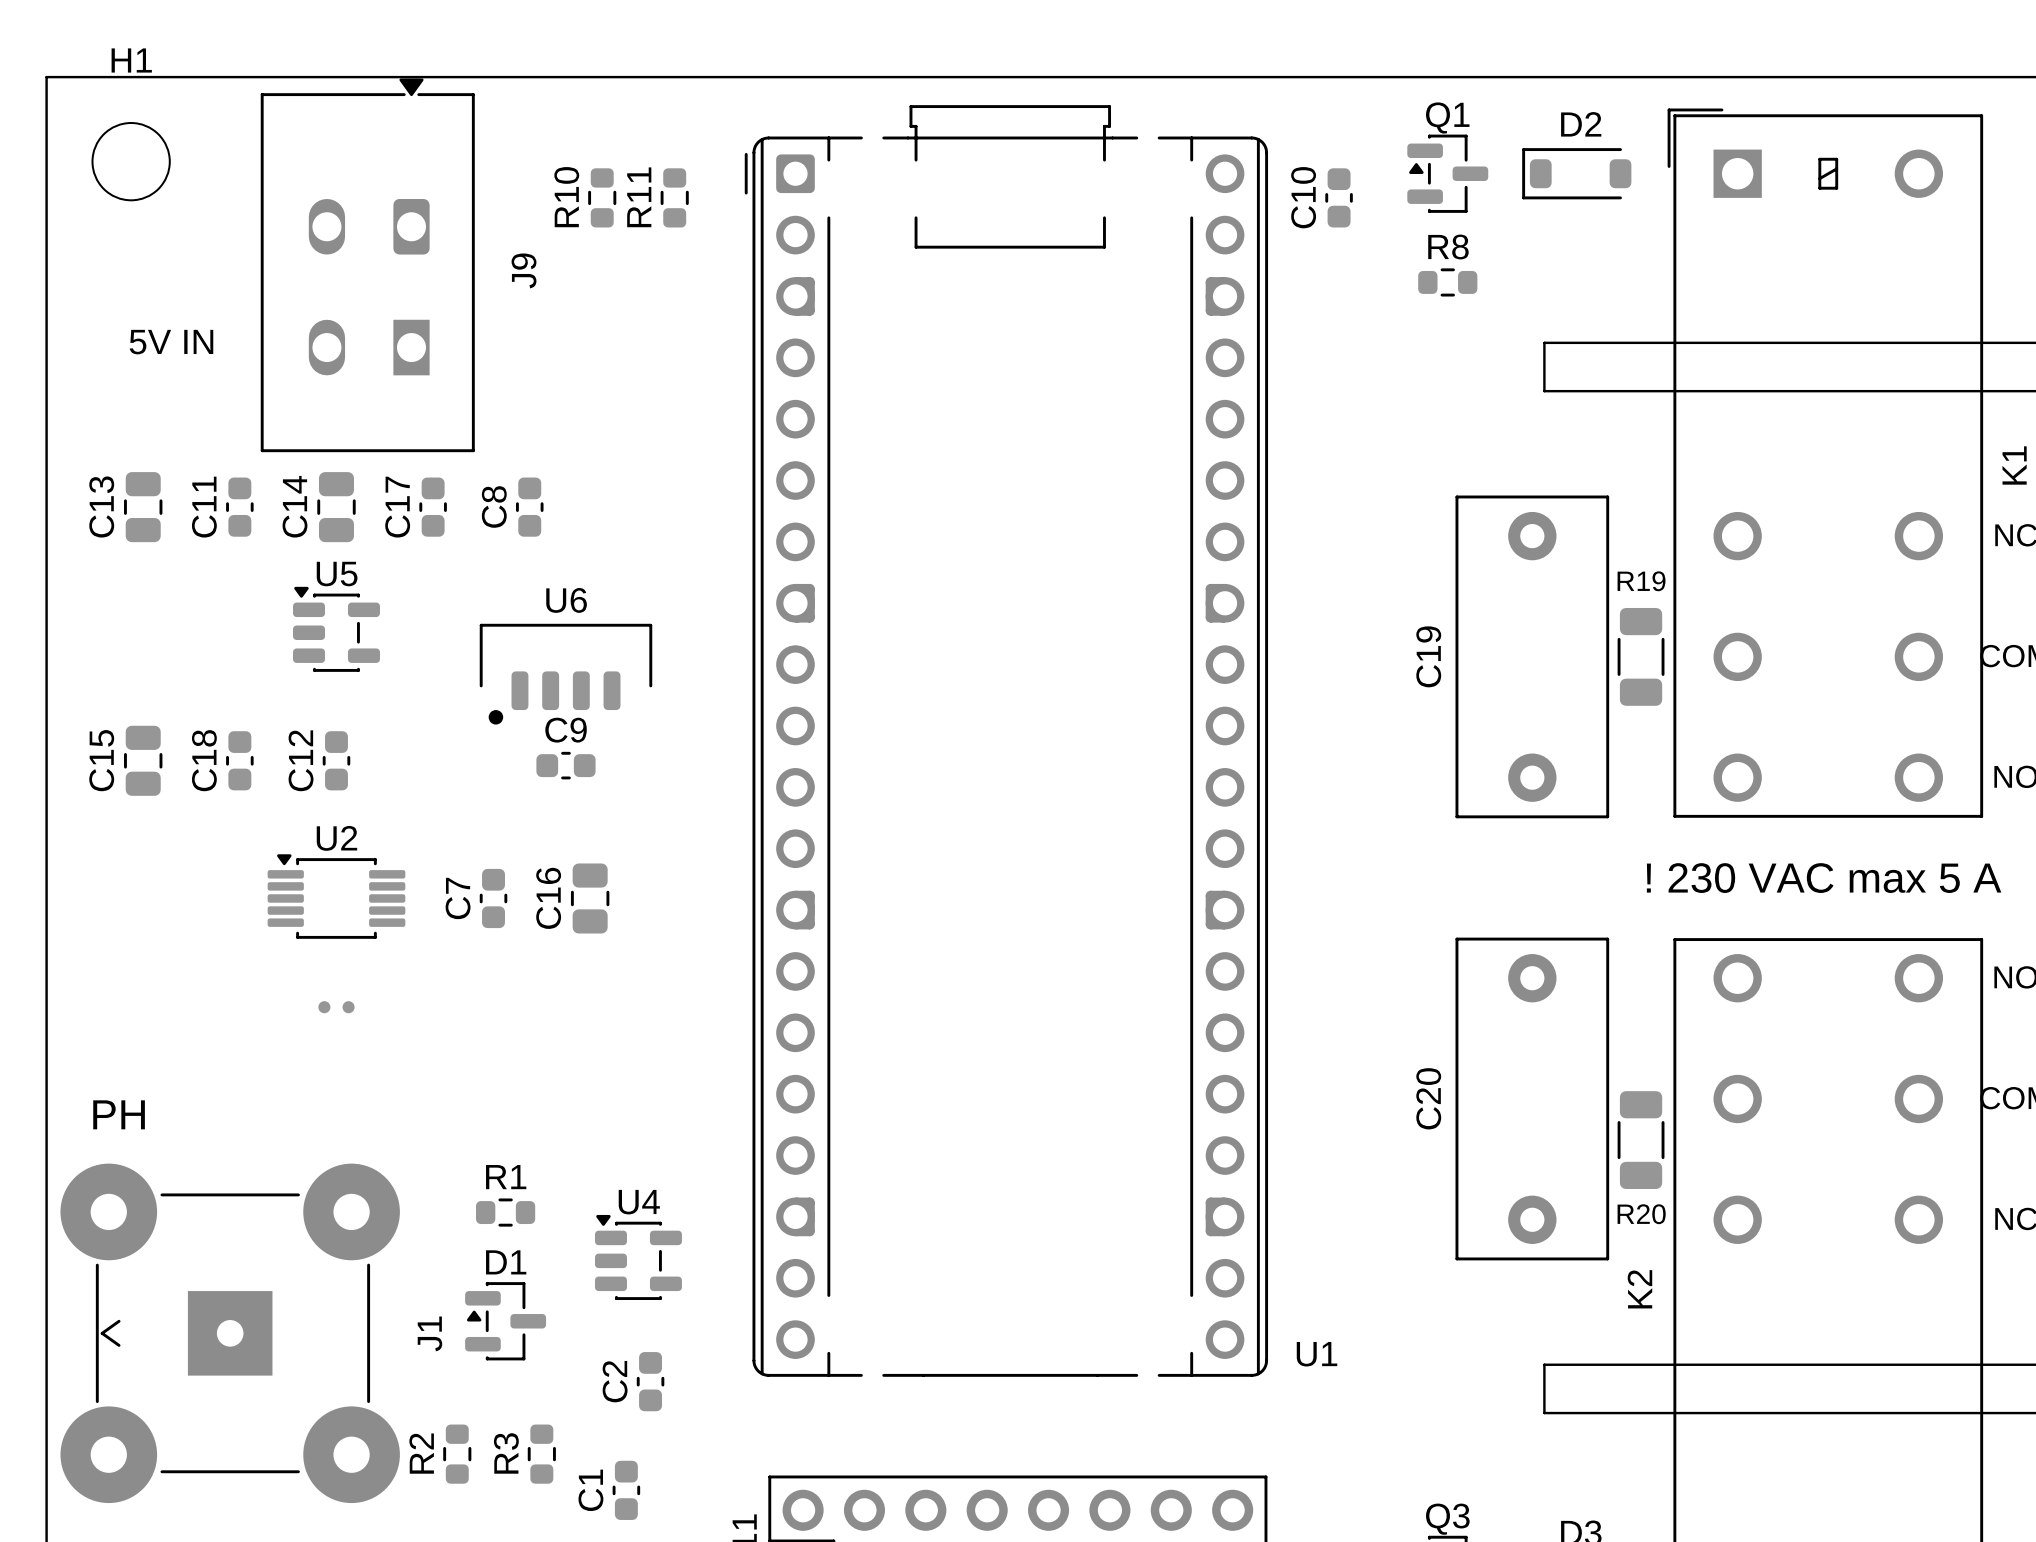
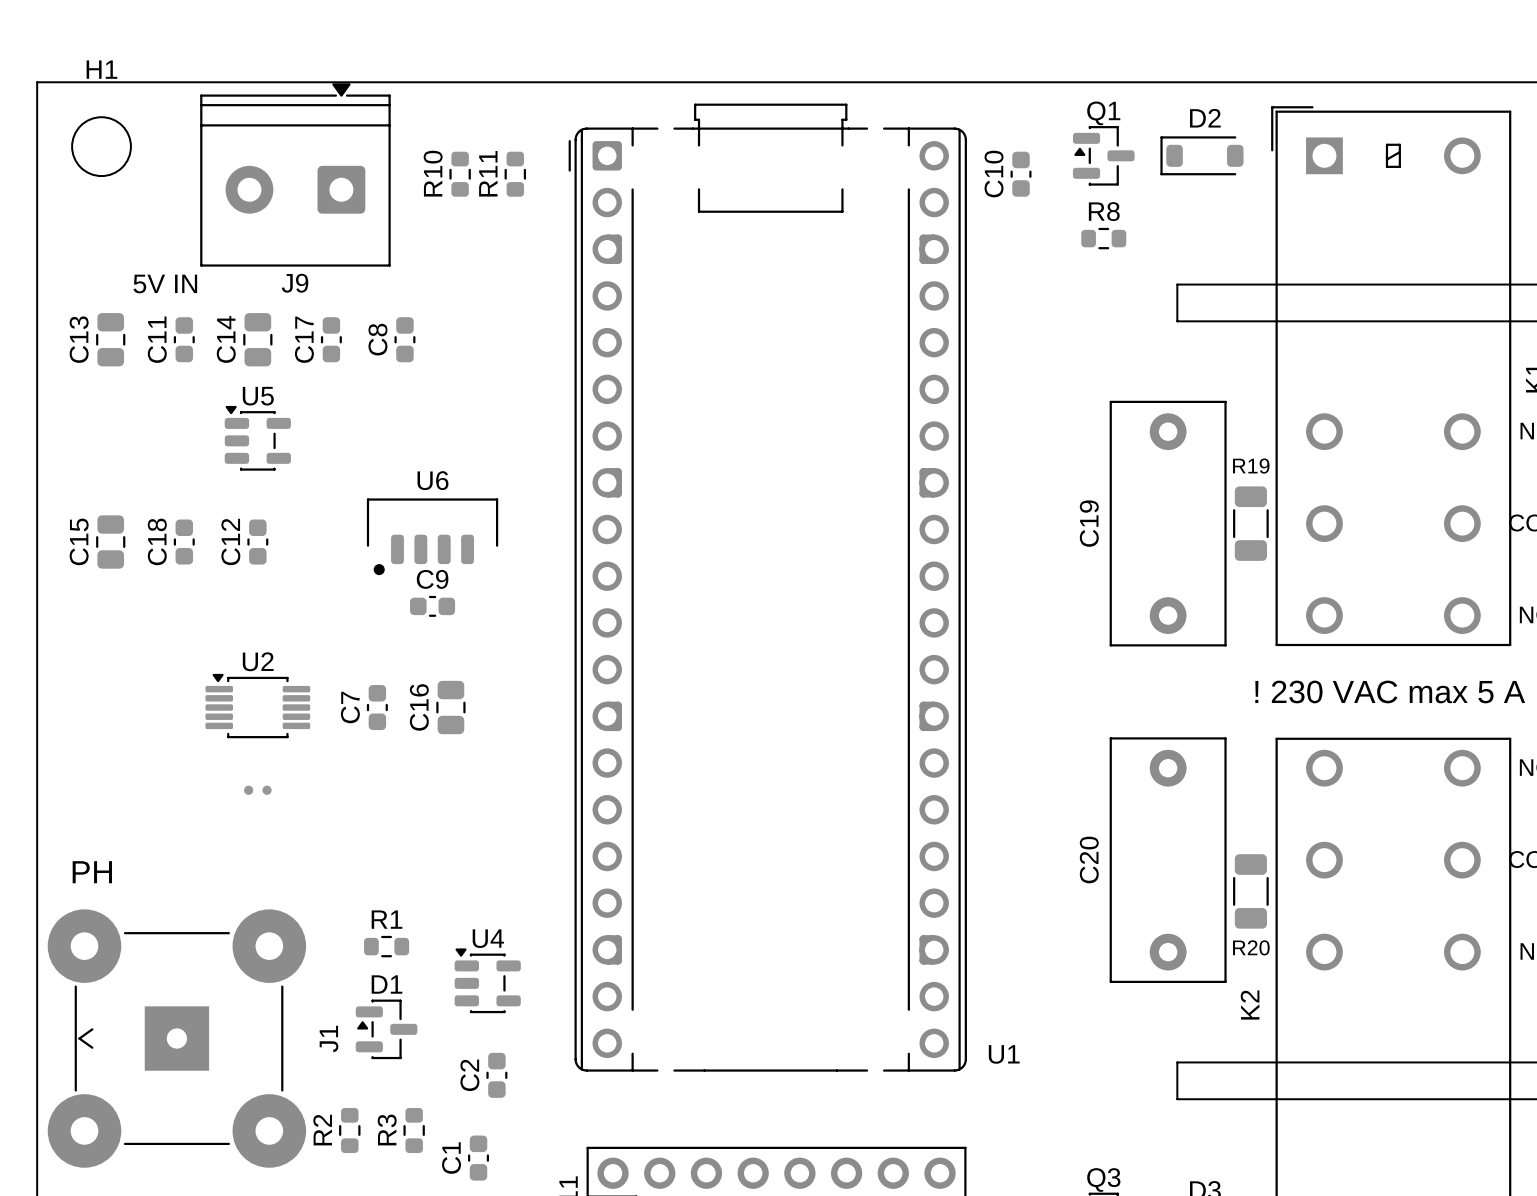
J9 footprint: [260, 78, 475, 453] -> [200, 83, 391, 267]
J9 name position: J9 (524, 270) -> J9 (295, 283)
text position: 5V IN (171, 342) -> 5V IN (165, 284)
C13 position: (143, 507) -> (110, 339)
C11 position: (239, 507) -> (184, 339)
C14 position: (336, 507) -> (257, 339)
C17 position: (433, 507) -> (331, 339)
C8 position: (529, 507) -> (404, 339)
U5 position: (336, 629) -> (257, 438)
C15 position: (143, 760) -> (110, 542)
C18 position: (239, 760) -> (184, 542)
C12 position: (336, 760) -> (257, 542)

